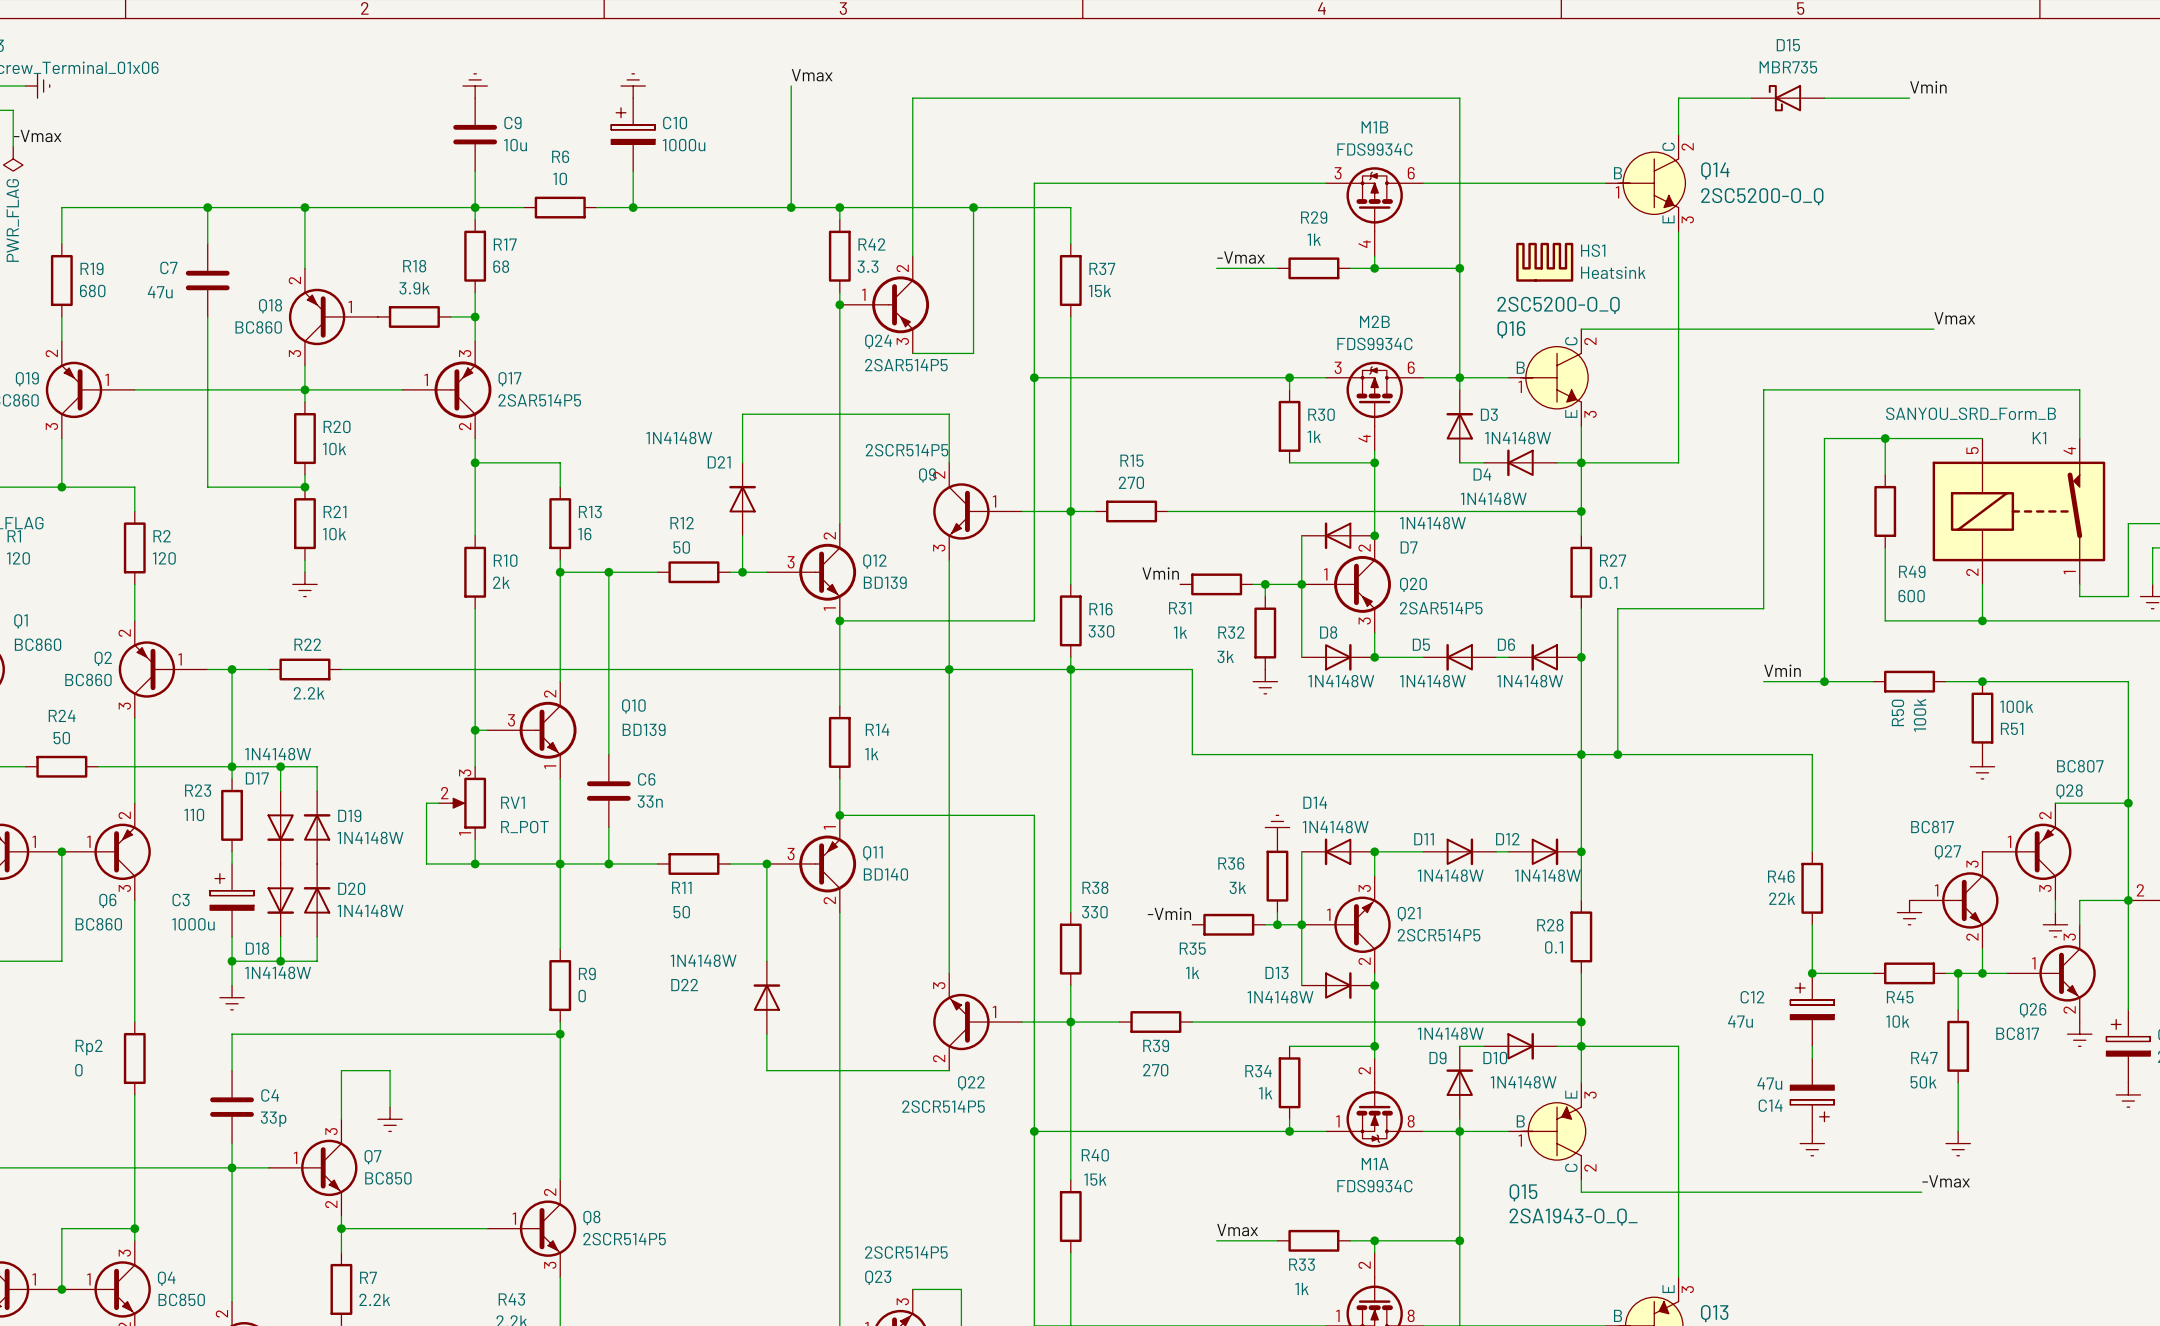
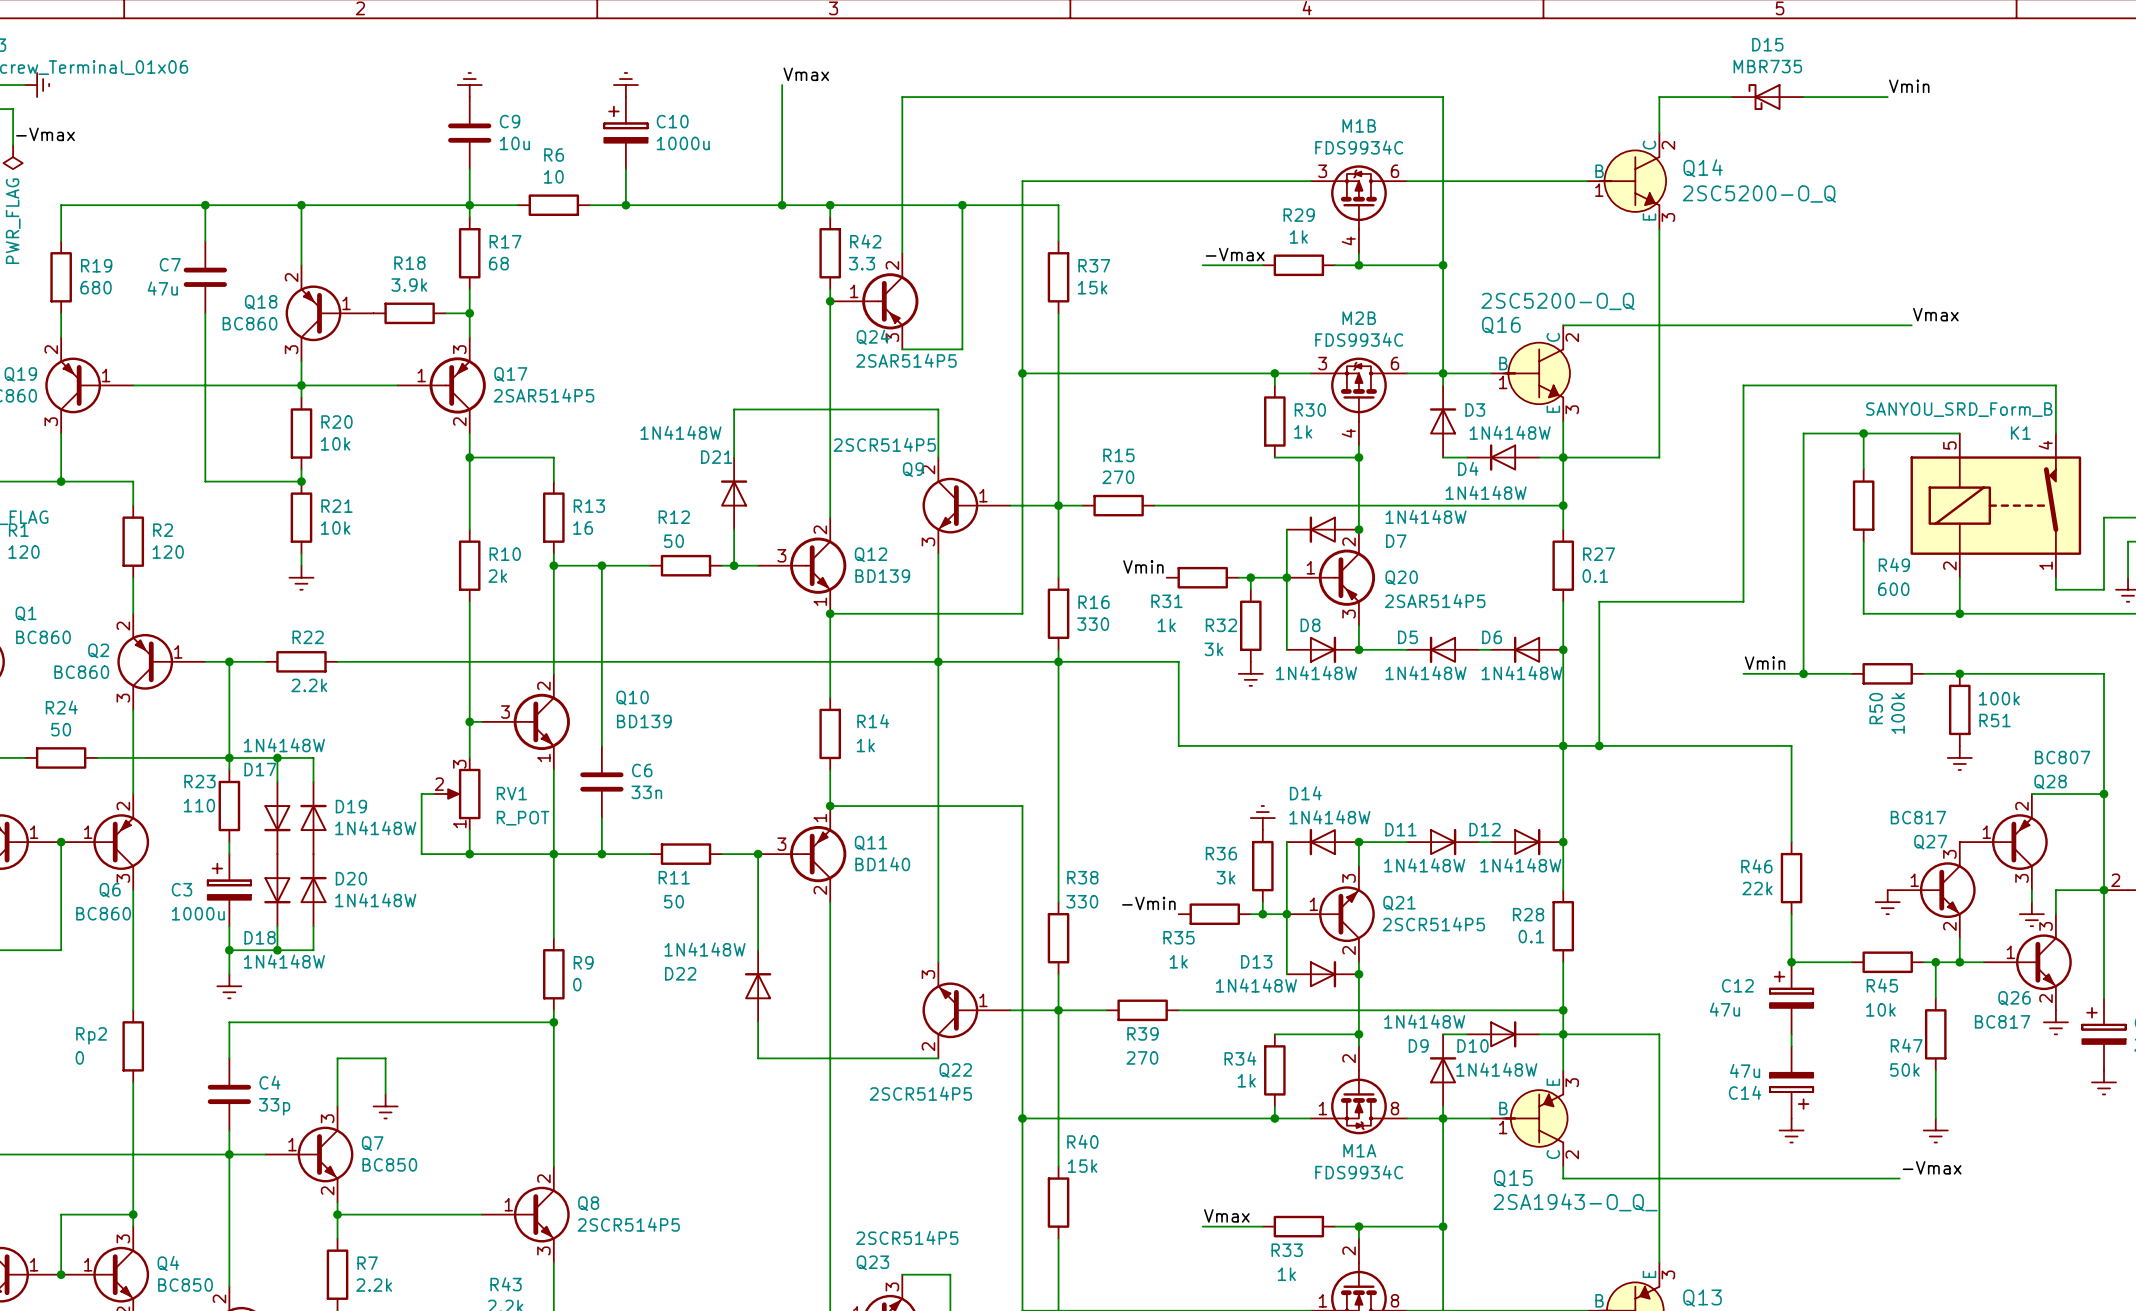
HS1: Heatsink (1544, 262) -> none

